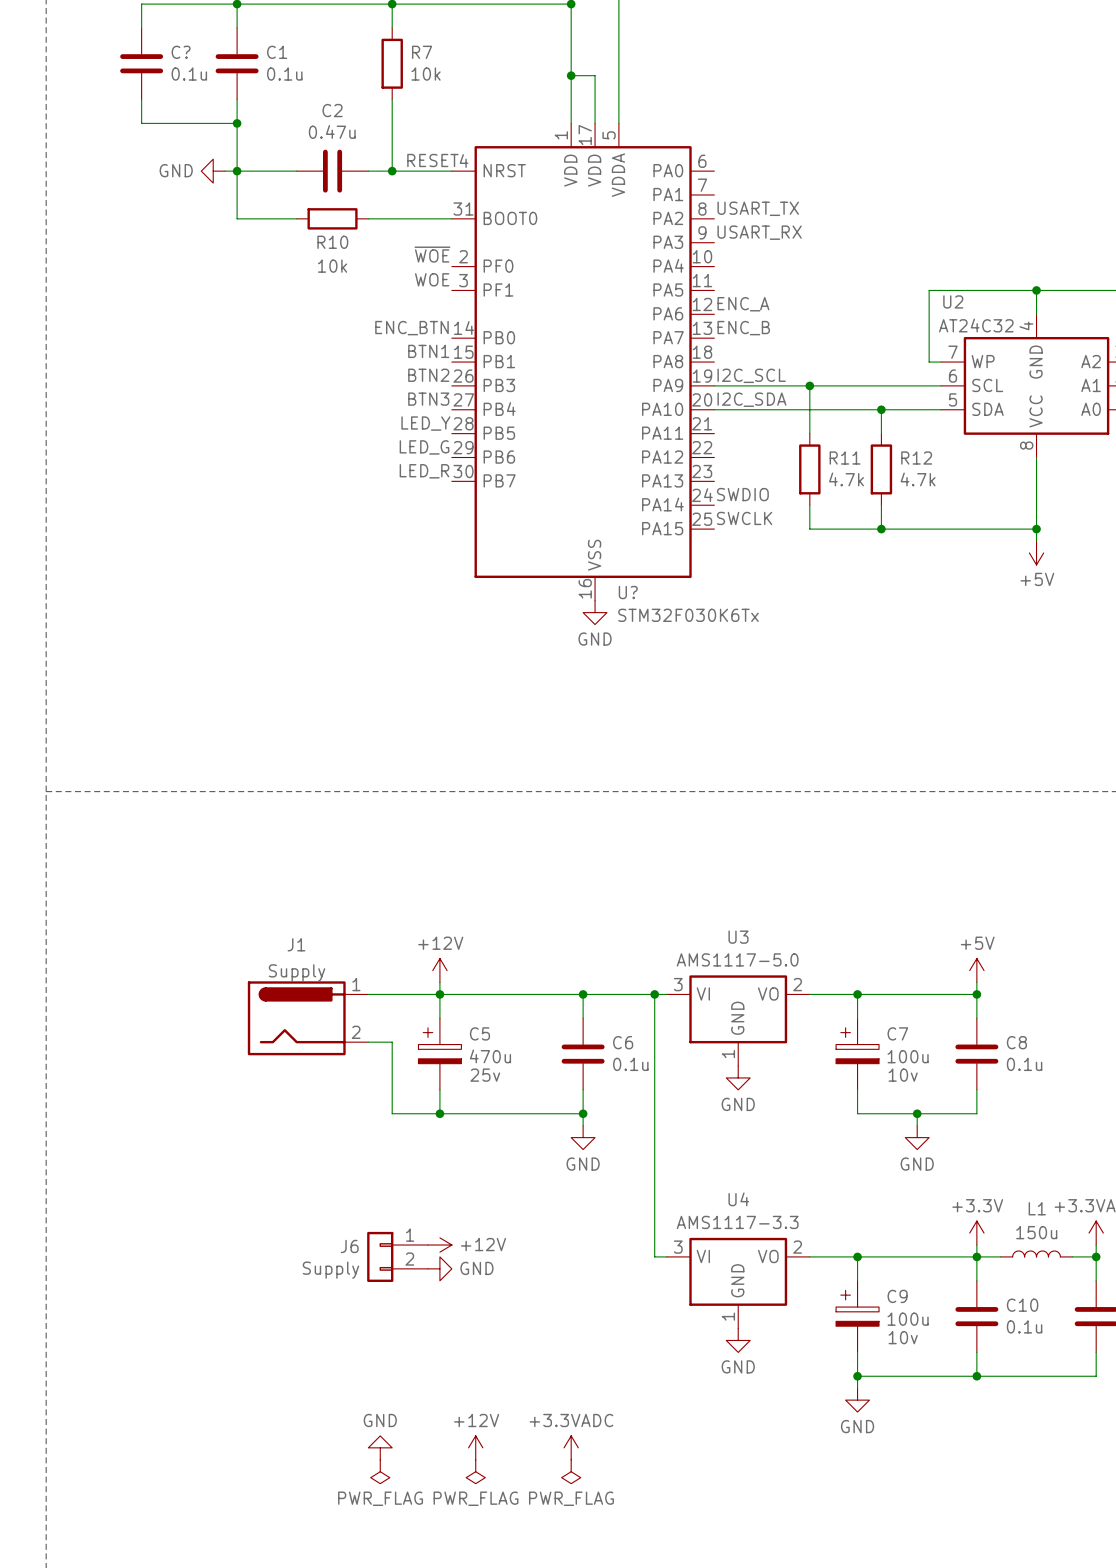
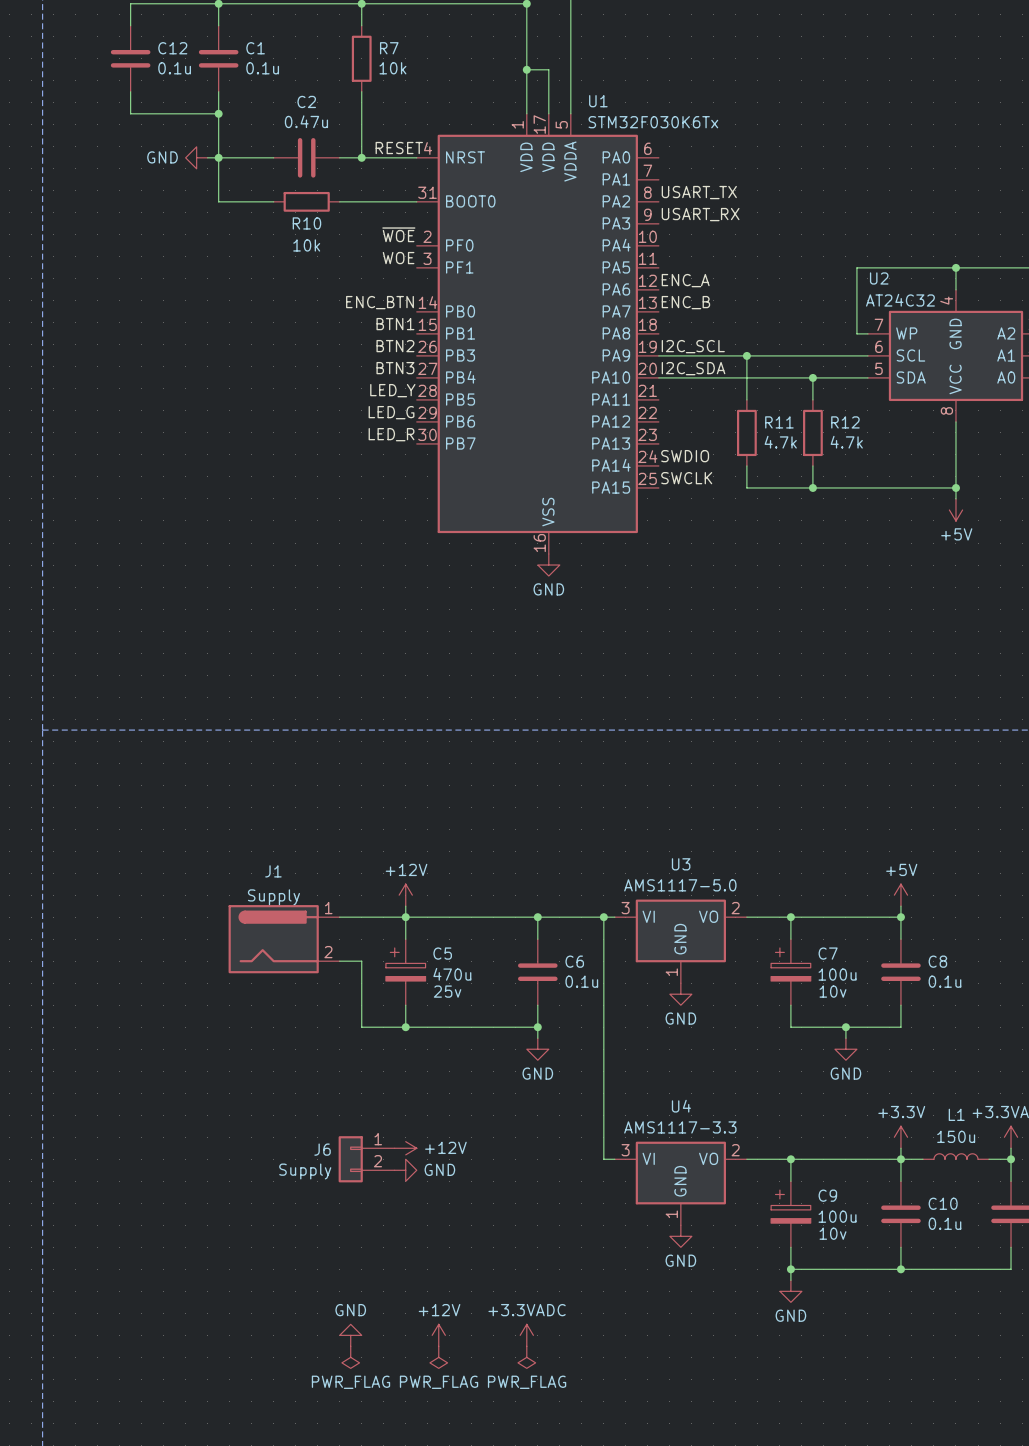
C? name: C? (181, 52) -> C12 (172, 48)
U? name: U? (628, 592) -> U1 (598, 101)
U? value position: STM32F030K6Tx (688, 615) -> STM32F030K6Tx (653, 122)

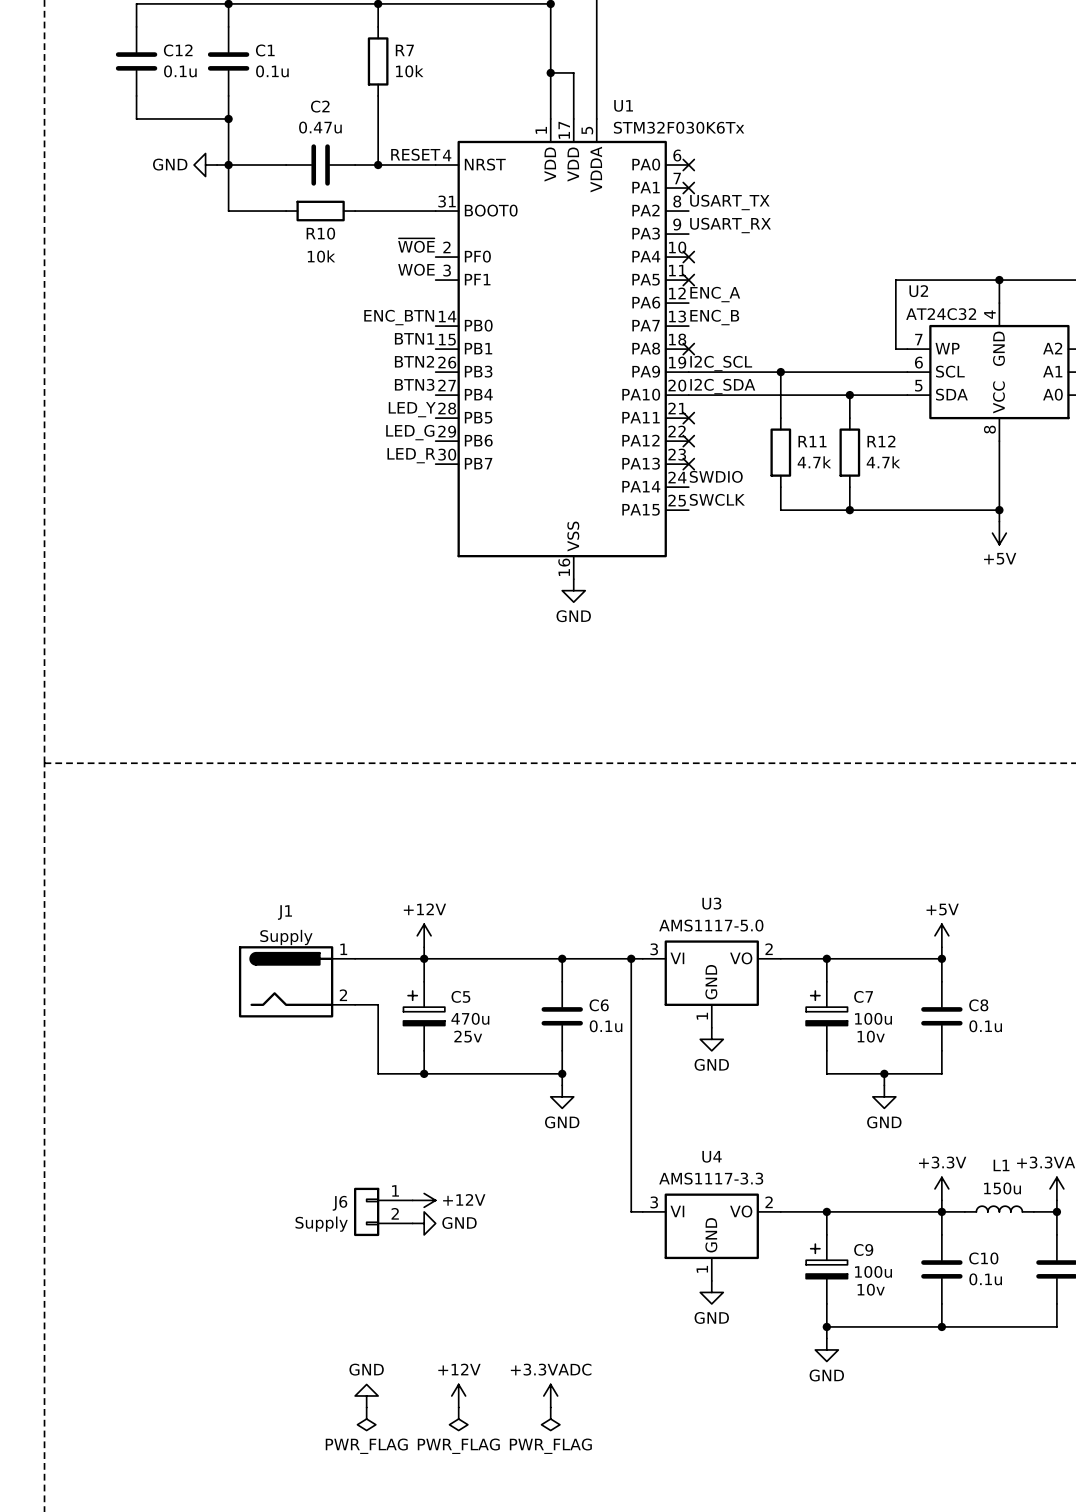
no-connect mark: none -> (688, 165)
no-connect mark: none -> (688, 188)
no-connect mark: none -> (688, 257)
no-connect mark: none -> (688, 280)
no-connect mark: none -> (688, 349)
no-connect mark: none -> (688, 418)
no-connect mark: none -> (688, 441)
no-connect mark: none -> (688, 464)

